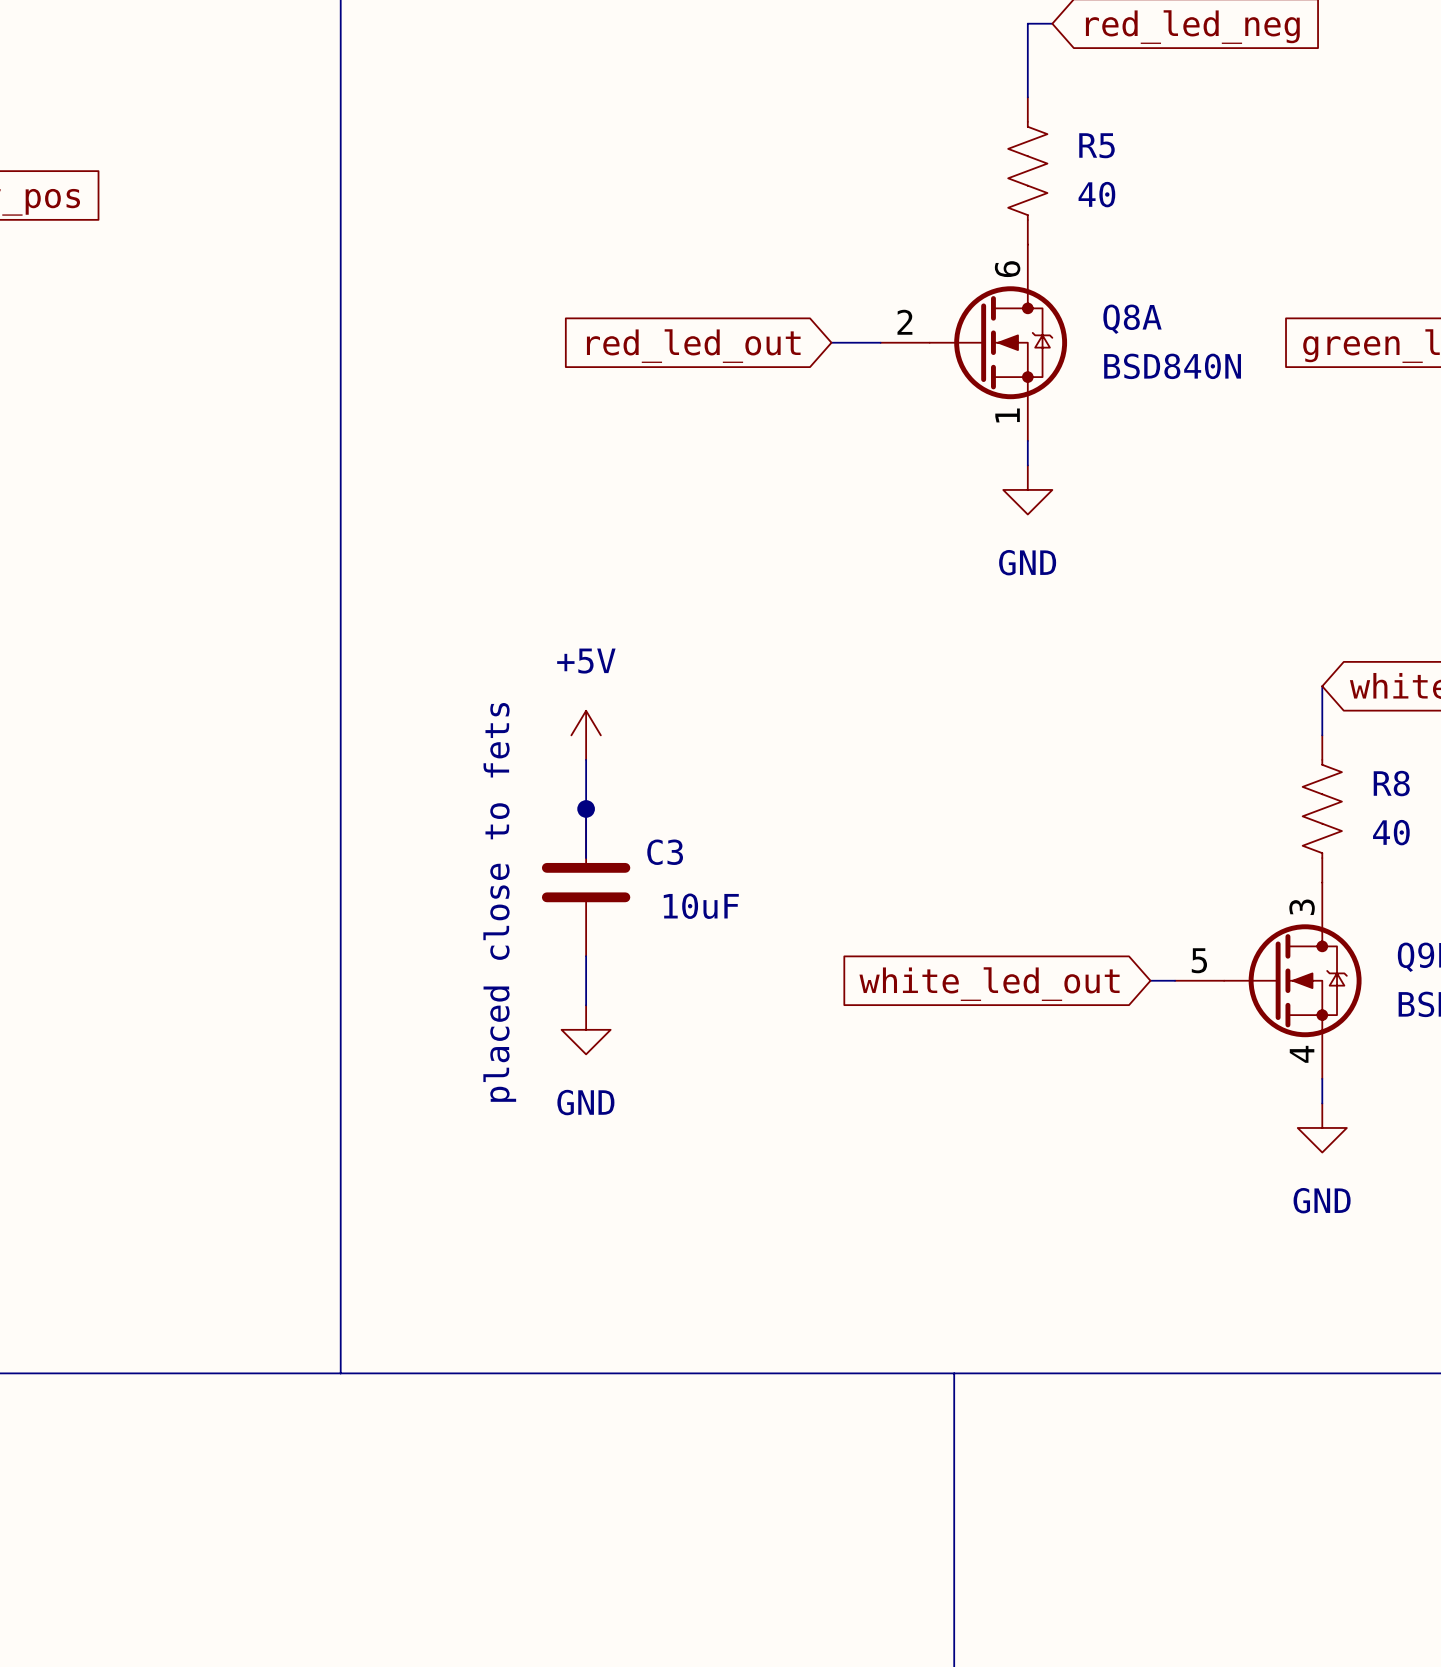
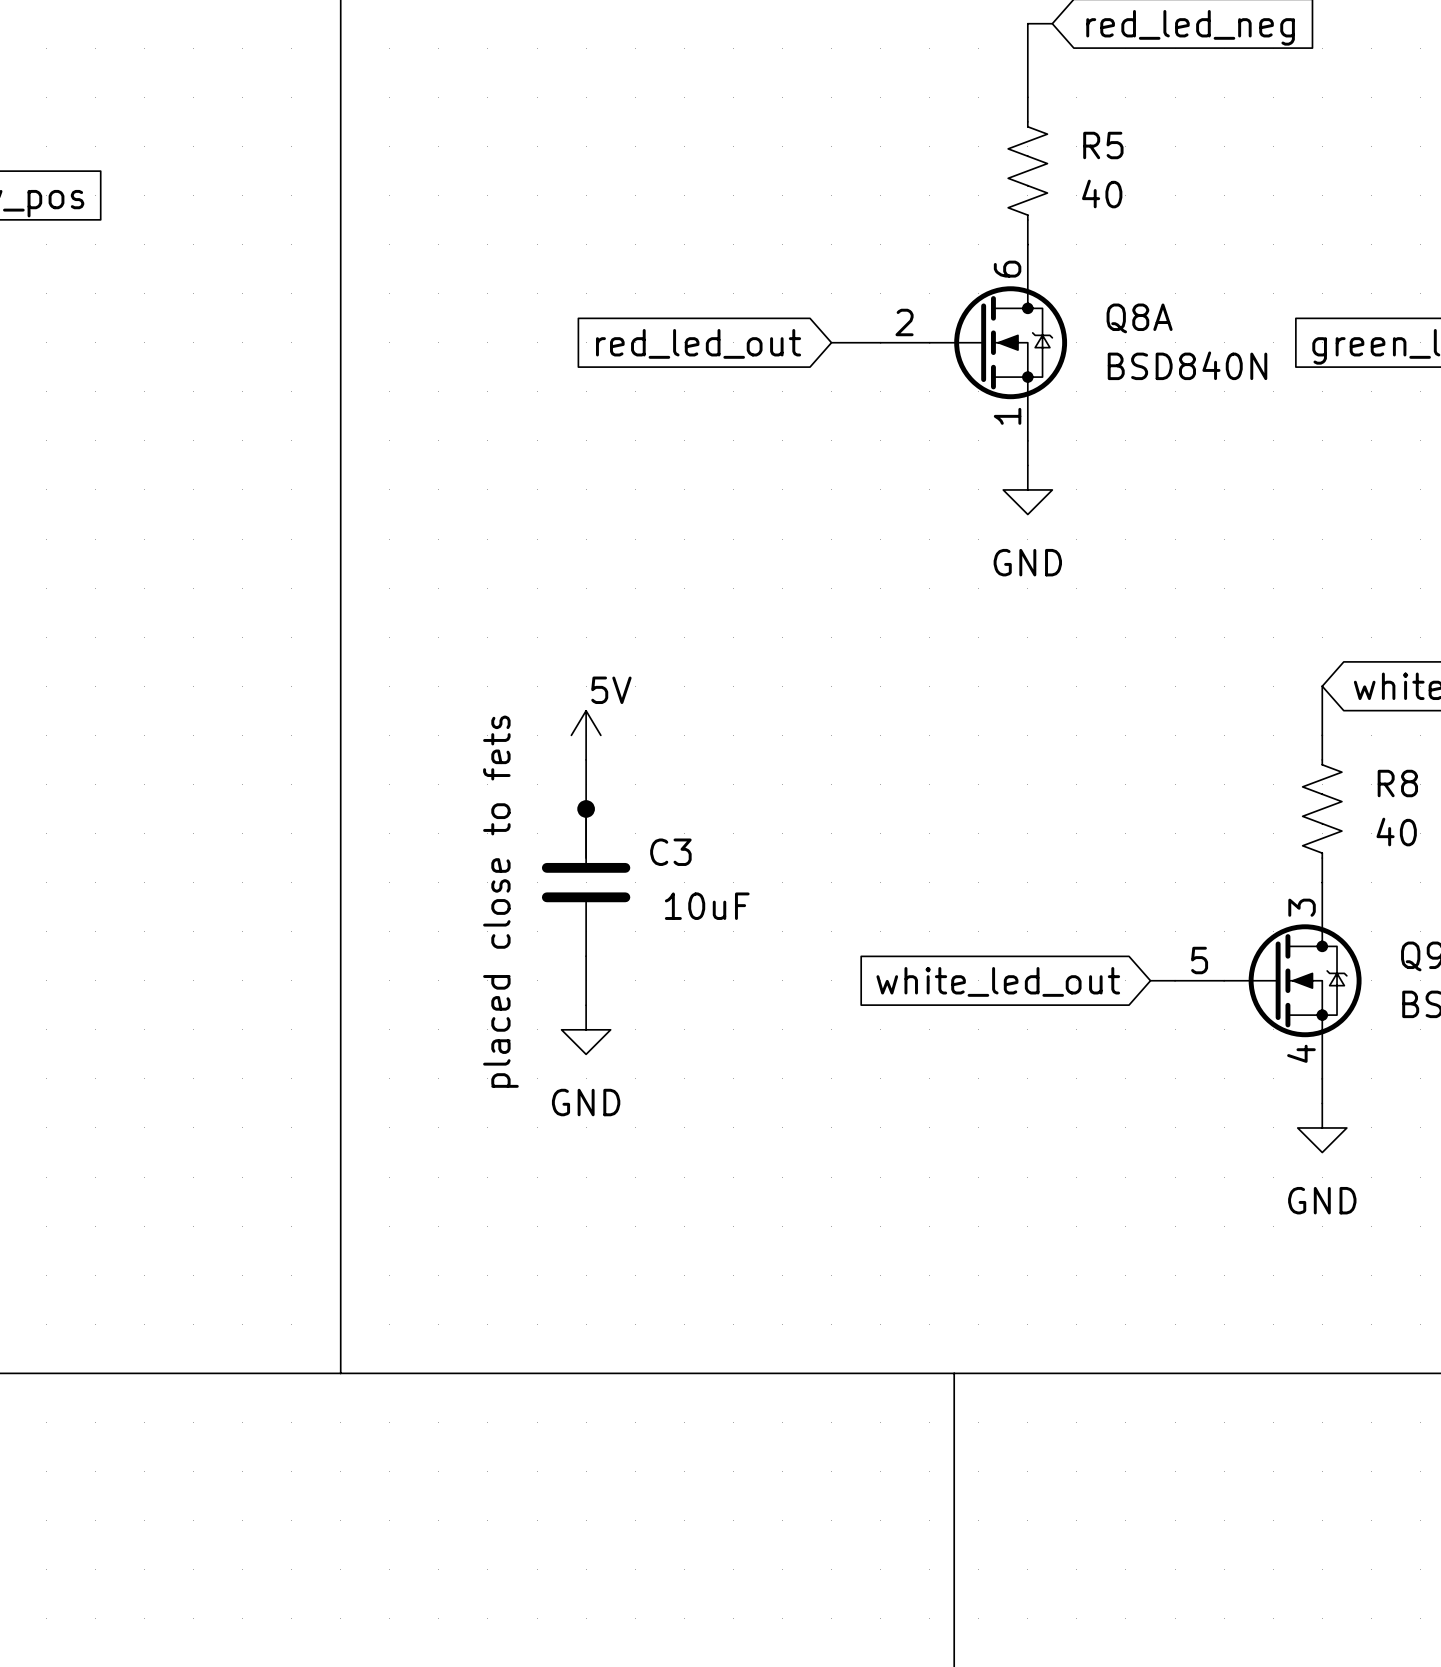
power symbol: +5V (586, 735) -> 5V (586, 735)

